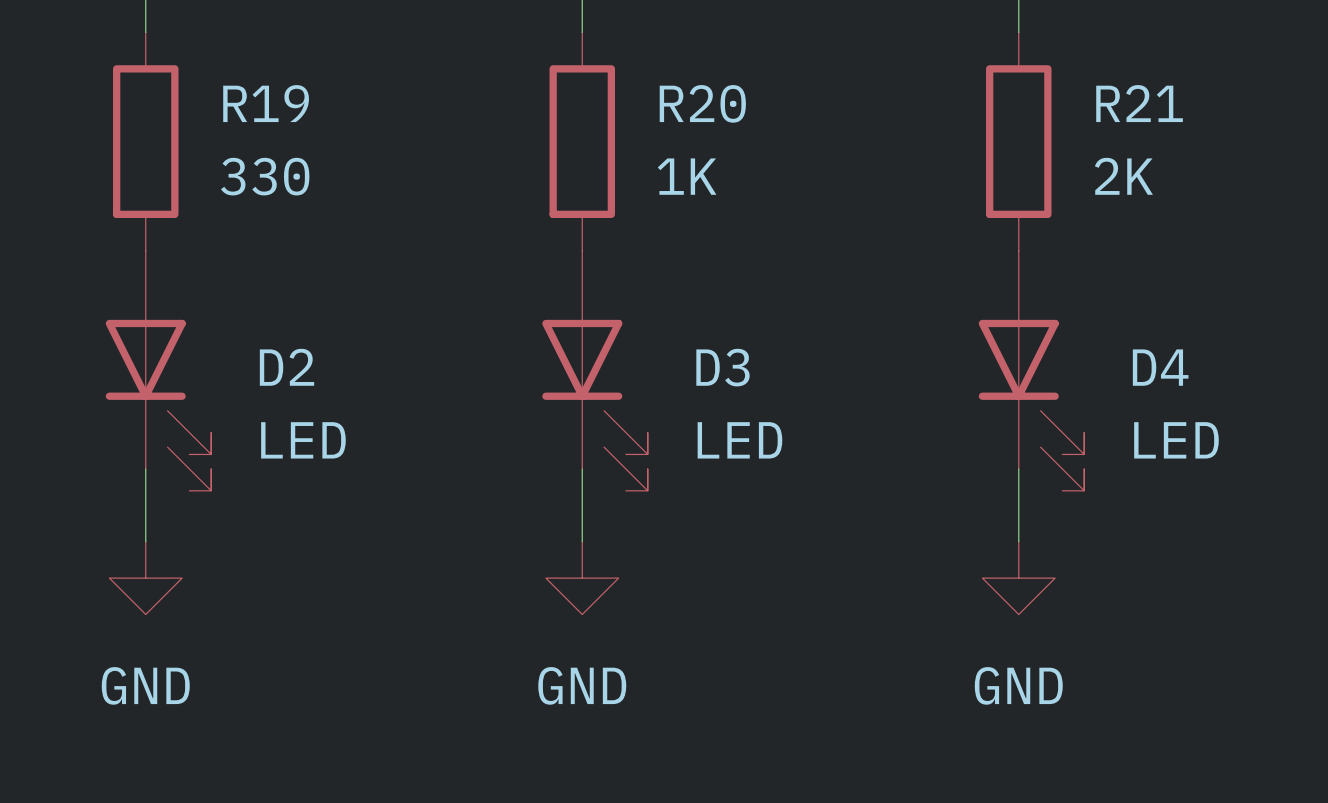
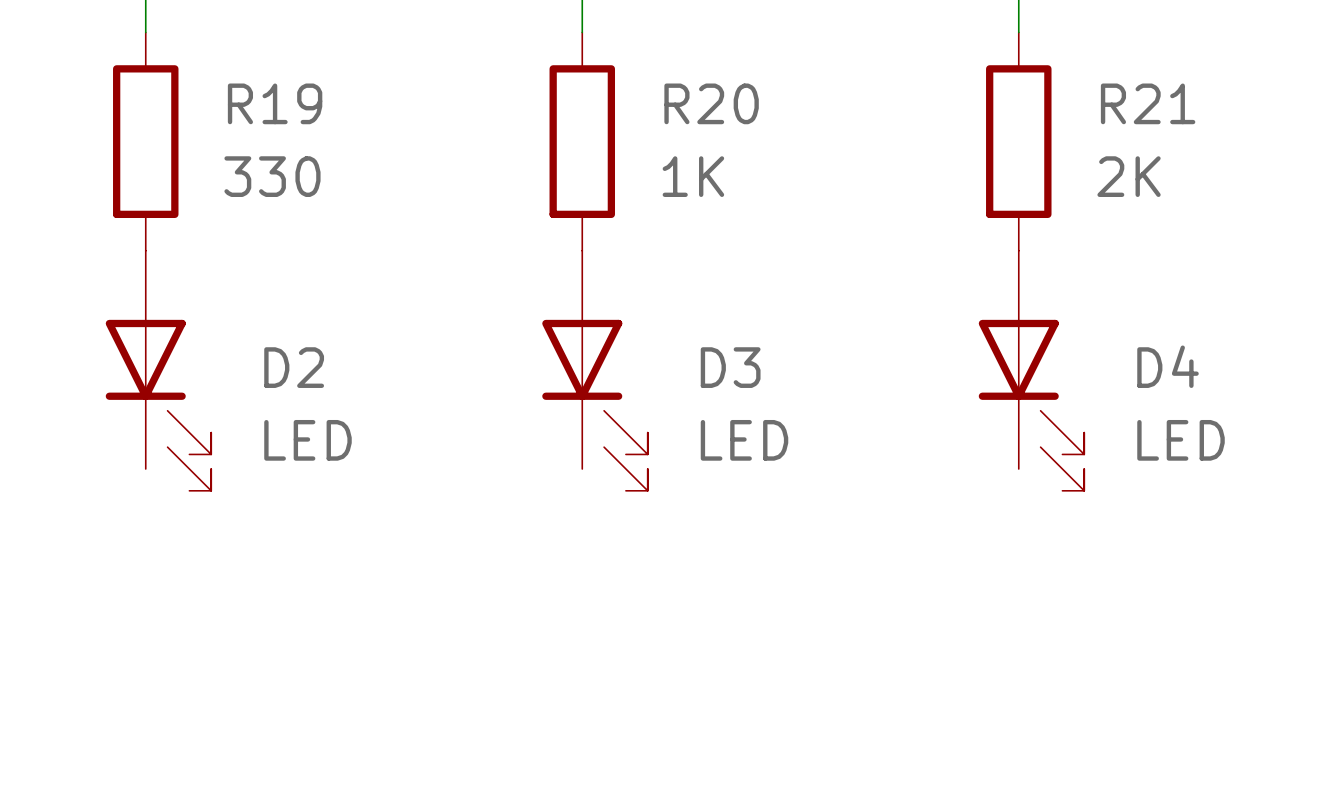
wire: (145, 468) (145, 541) -> none
wire: (582, 468) (582, 541) -> none
wire: (1018, 468) (1018, 541) -> none
power symbol: GND (145, 578) -> none
power symbol: GND (582, 578) -> none
power symbol: GND (1018, 578) -> none

